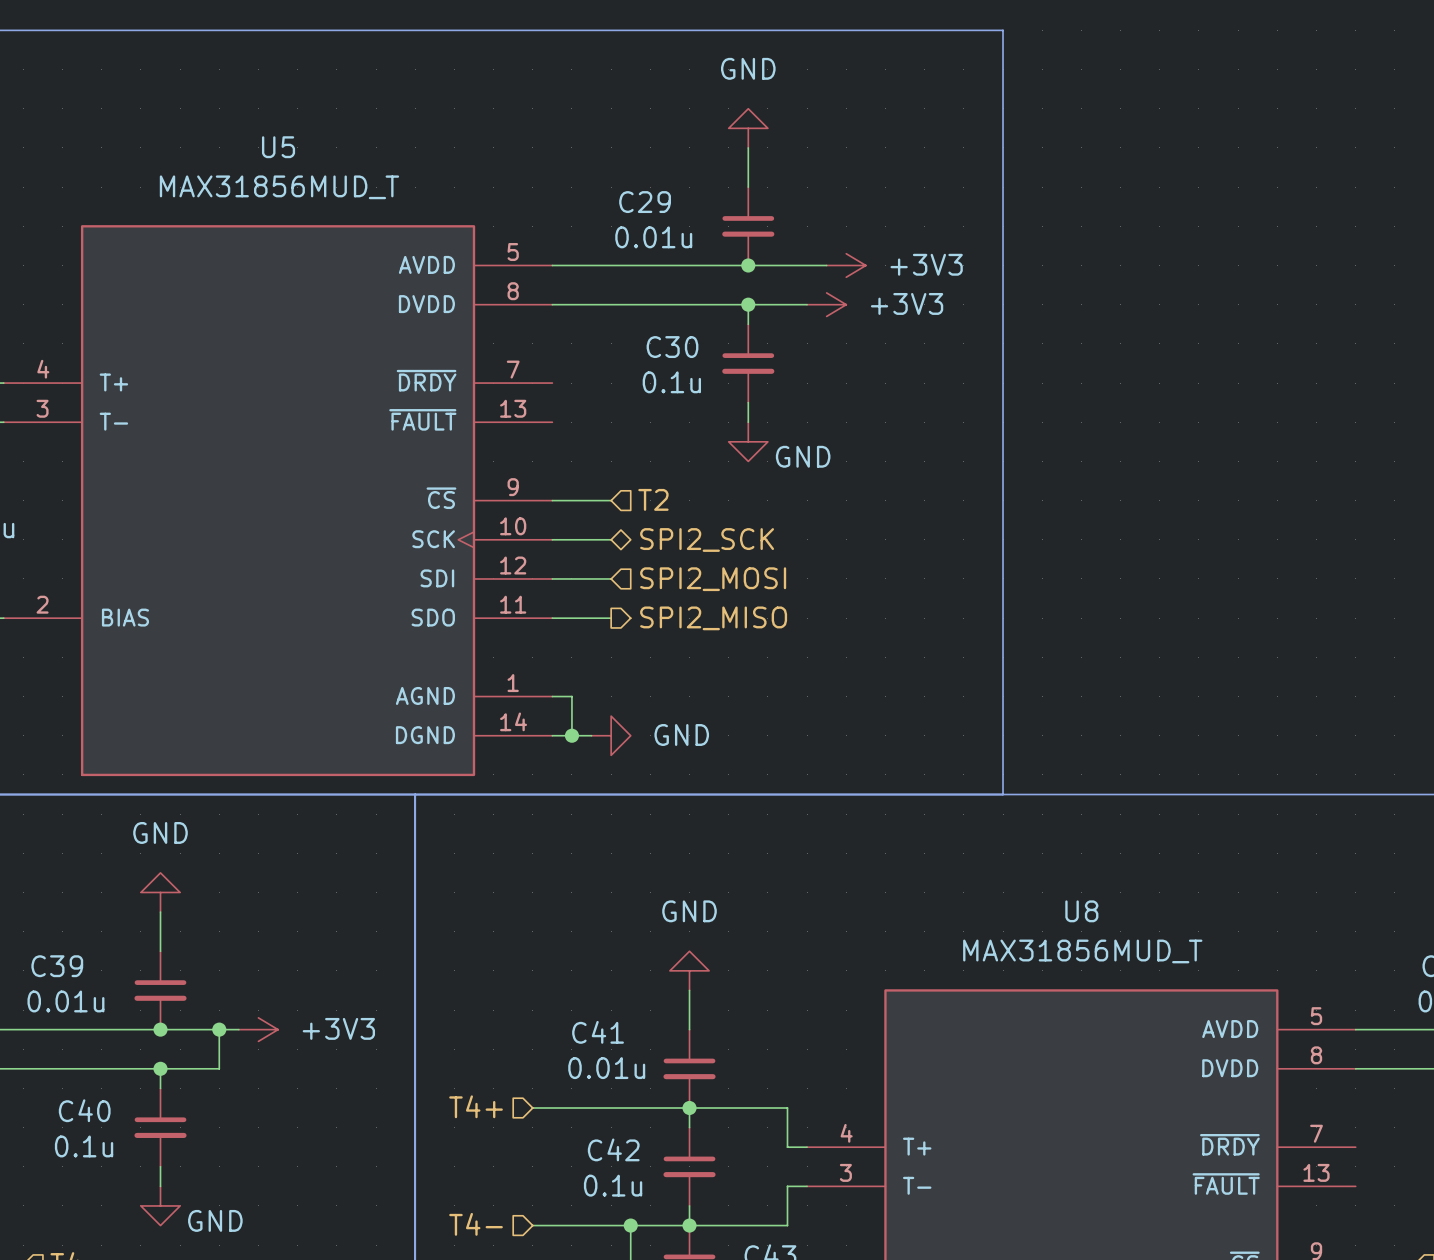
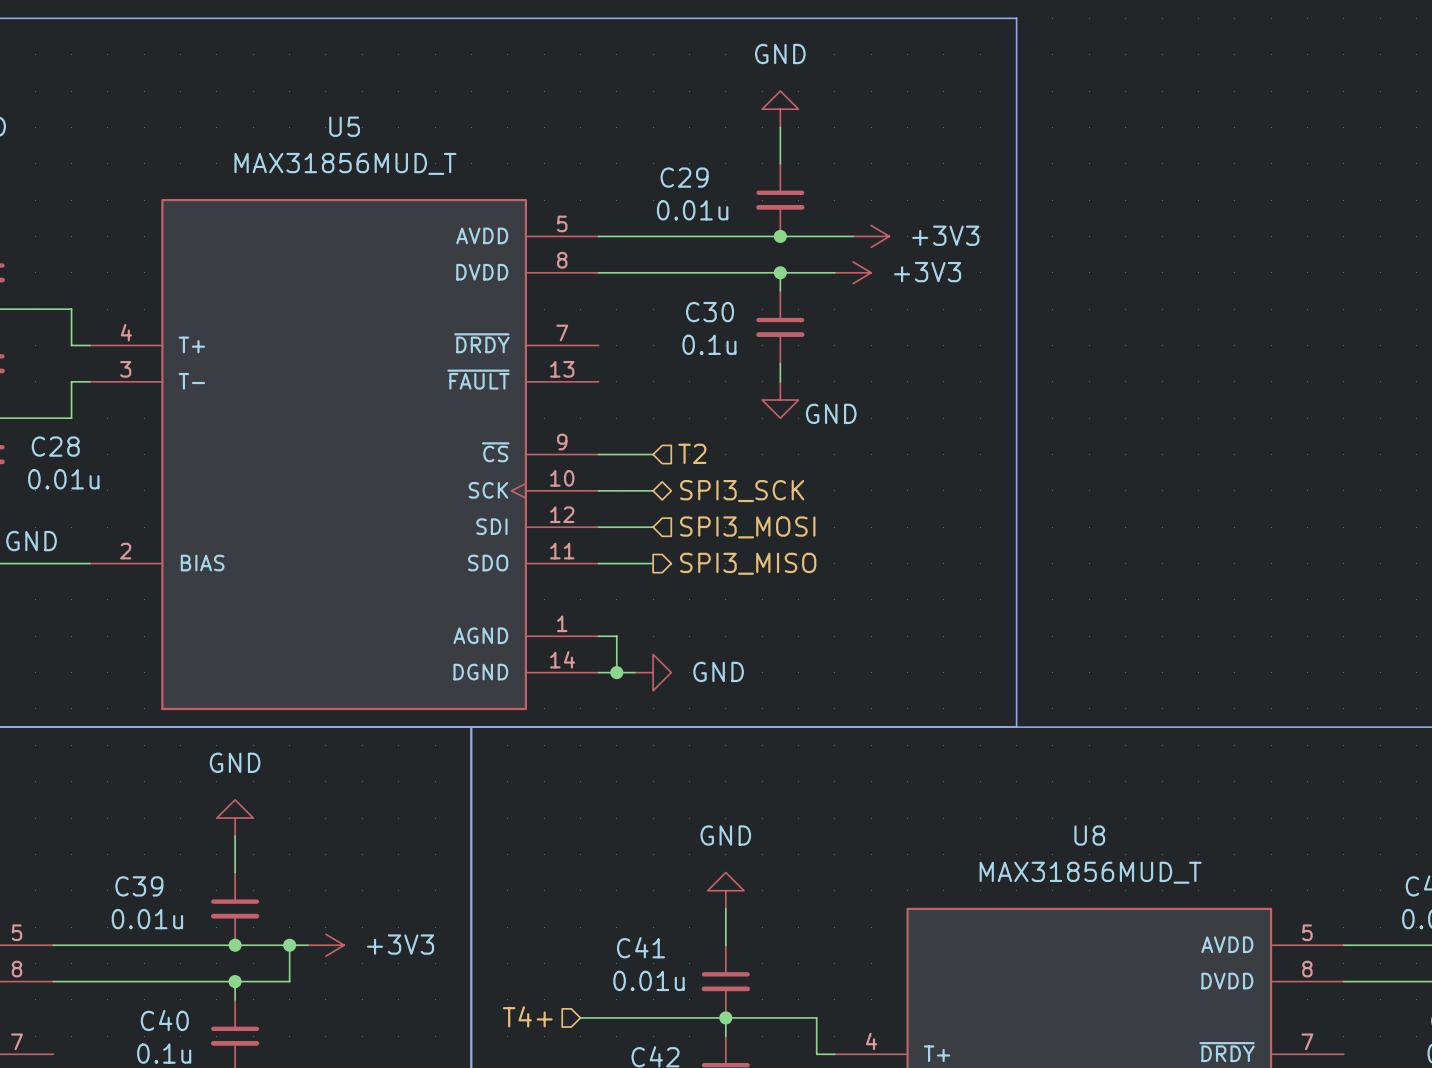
hierarchical label: SPI2_SCK (707, 540) -> SPI3_SCK (742, 491)
hierarchical label: SPI2_MOSI (713, 579) -> SPI3_MOSI (747, 527)
hierarchical label: SPI2_MISO (713, 618) -> SPI3_MISO (748, 563)

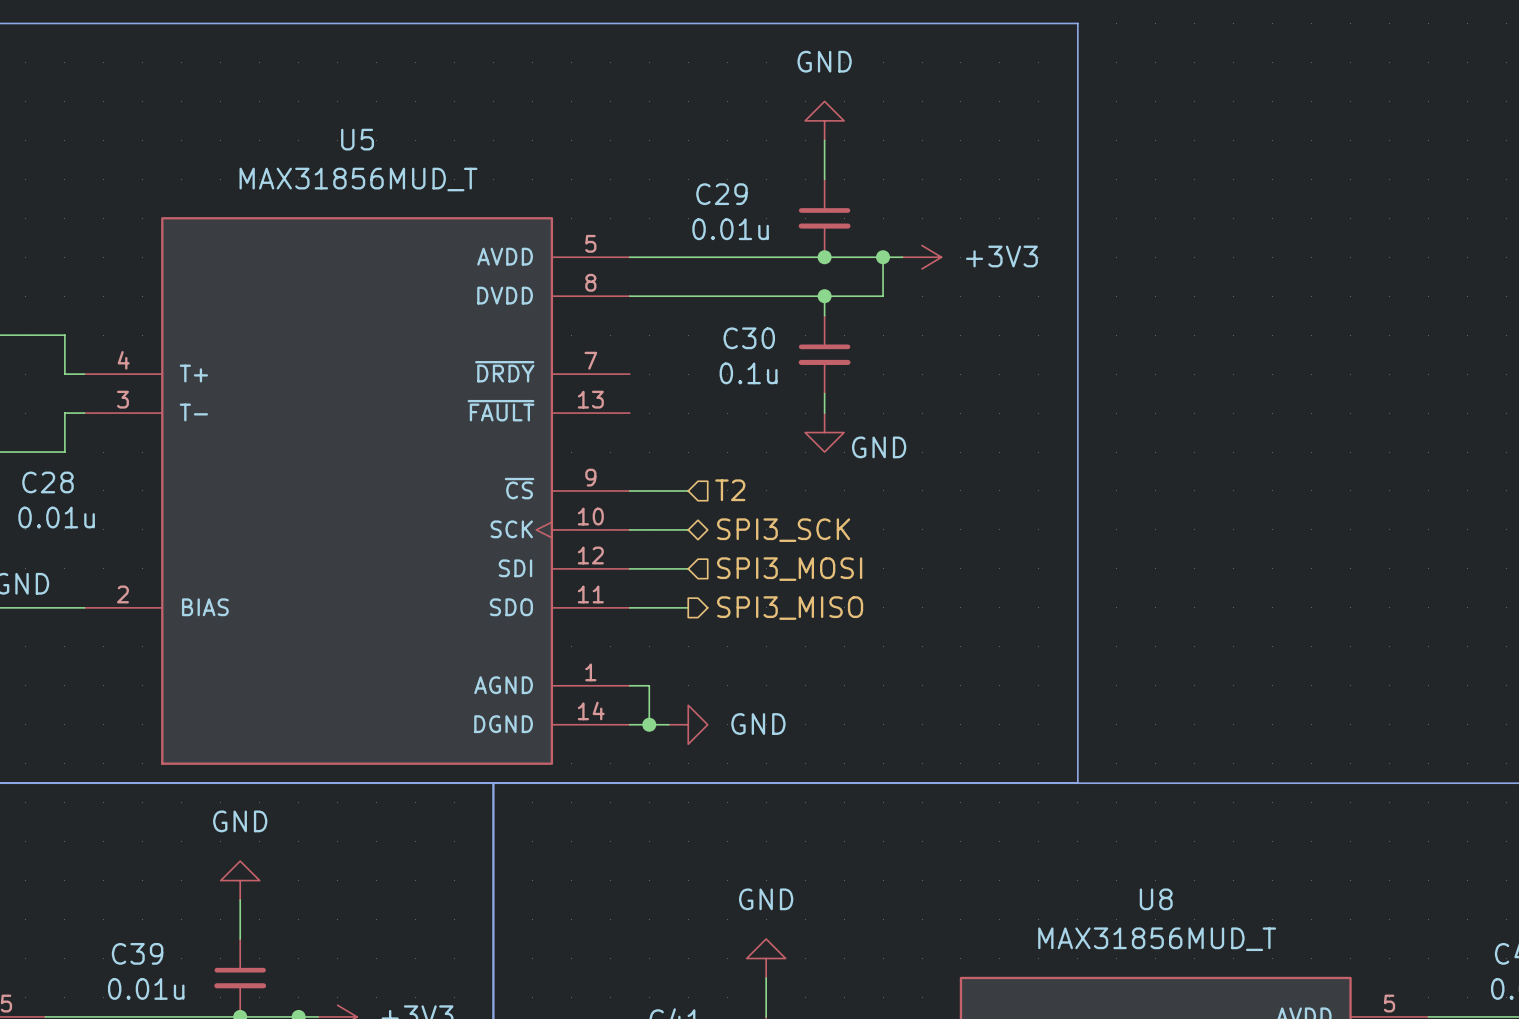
wire: none -> (883, 257) (883, 296)
junction: none -> (883, 257)
power symbol: +3V3 (853, 272) -> none

